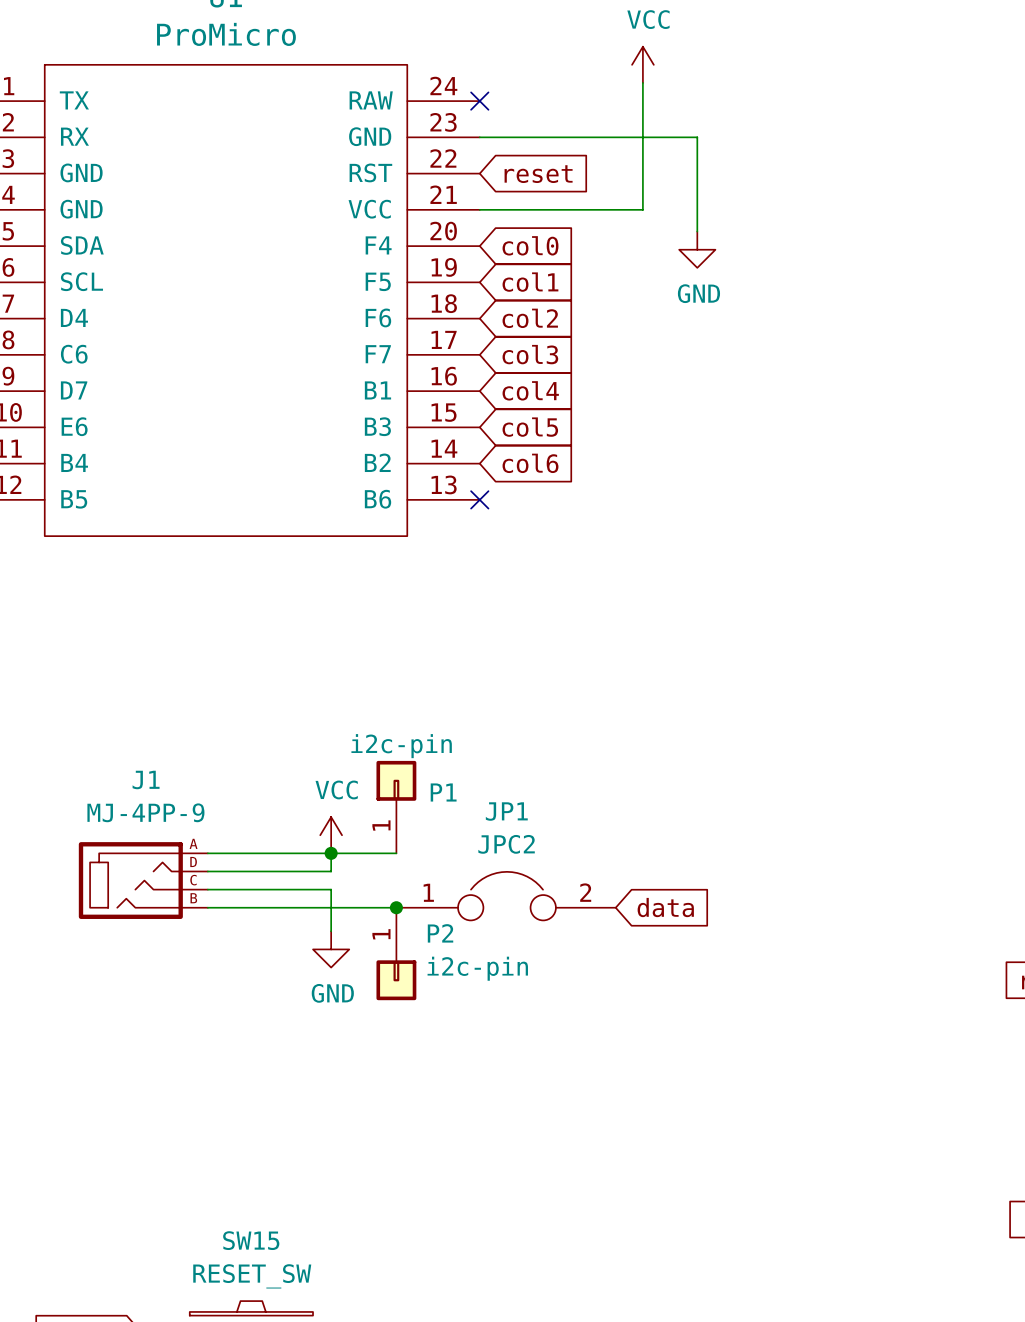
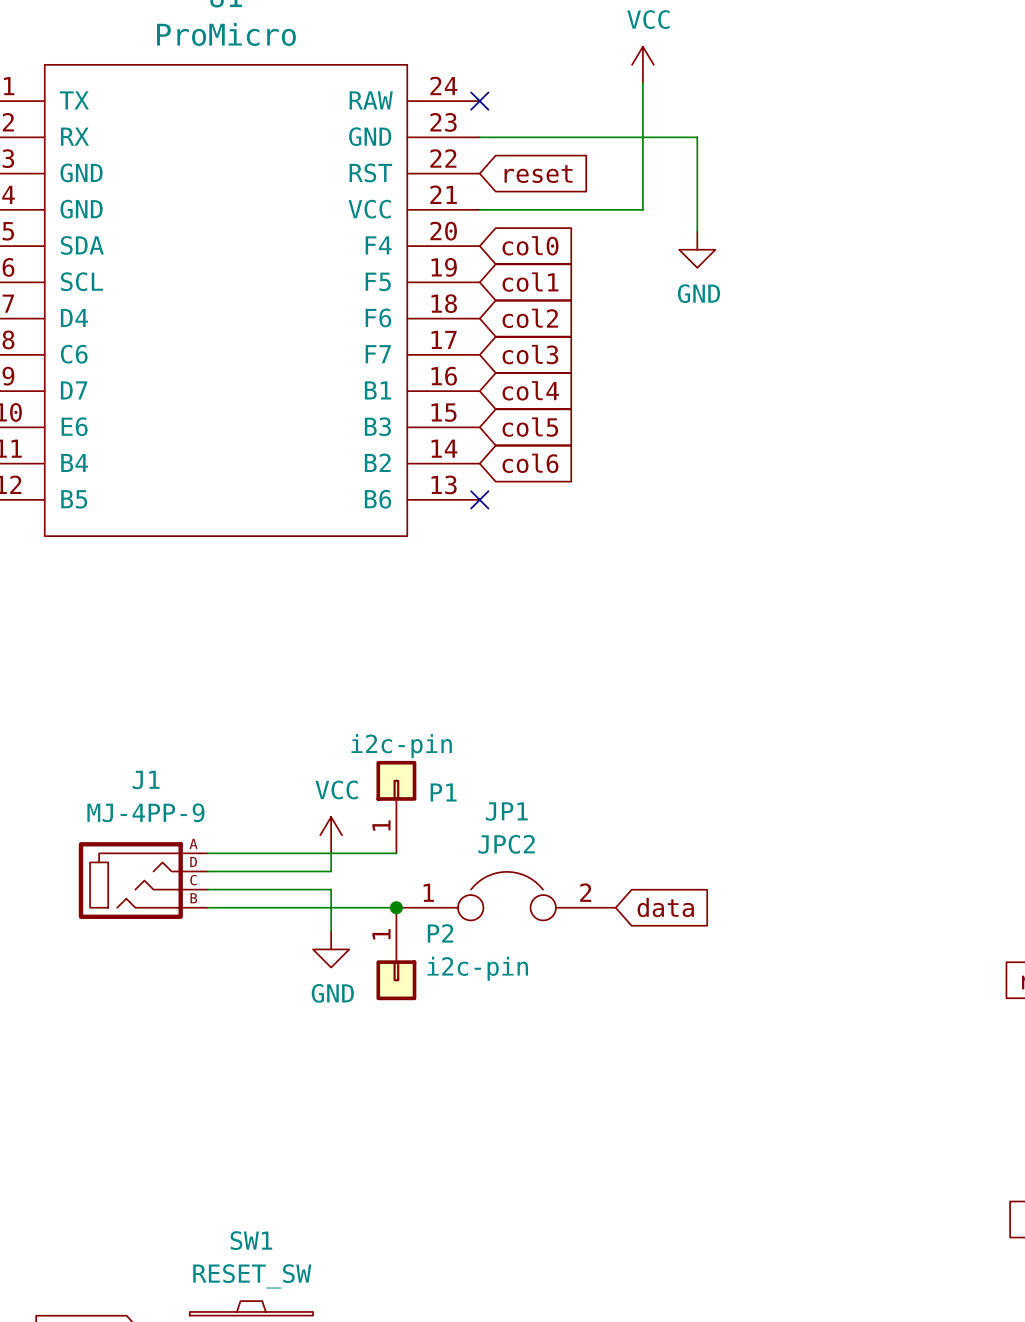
junction: (331, 853) -> none
SW15 name: SW15 (251, 1240) -> SW1 (251, 1240)

